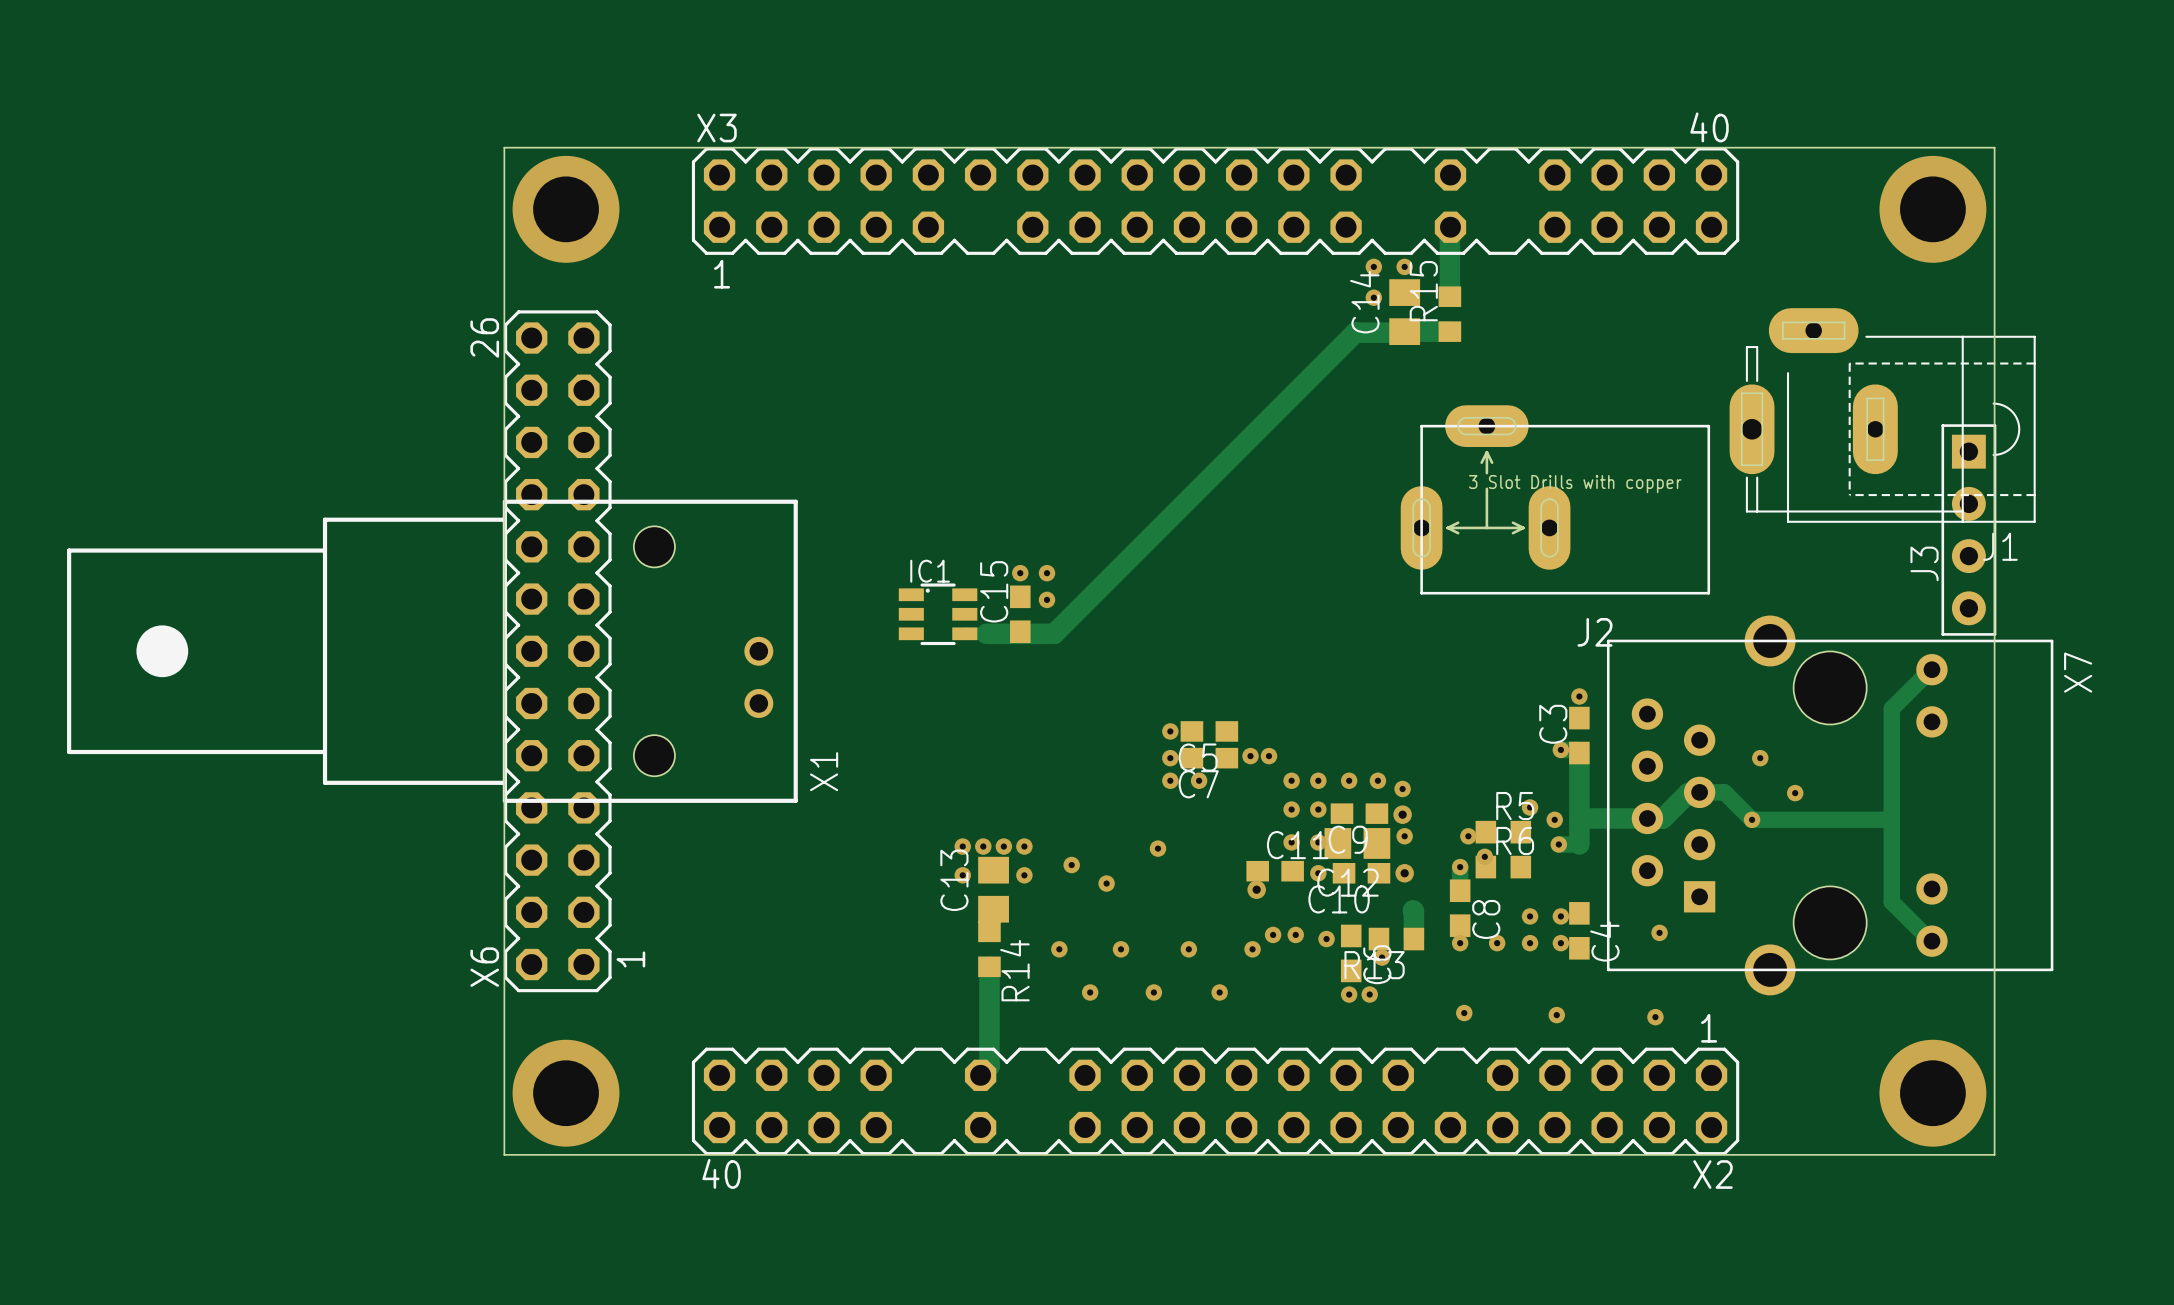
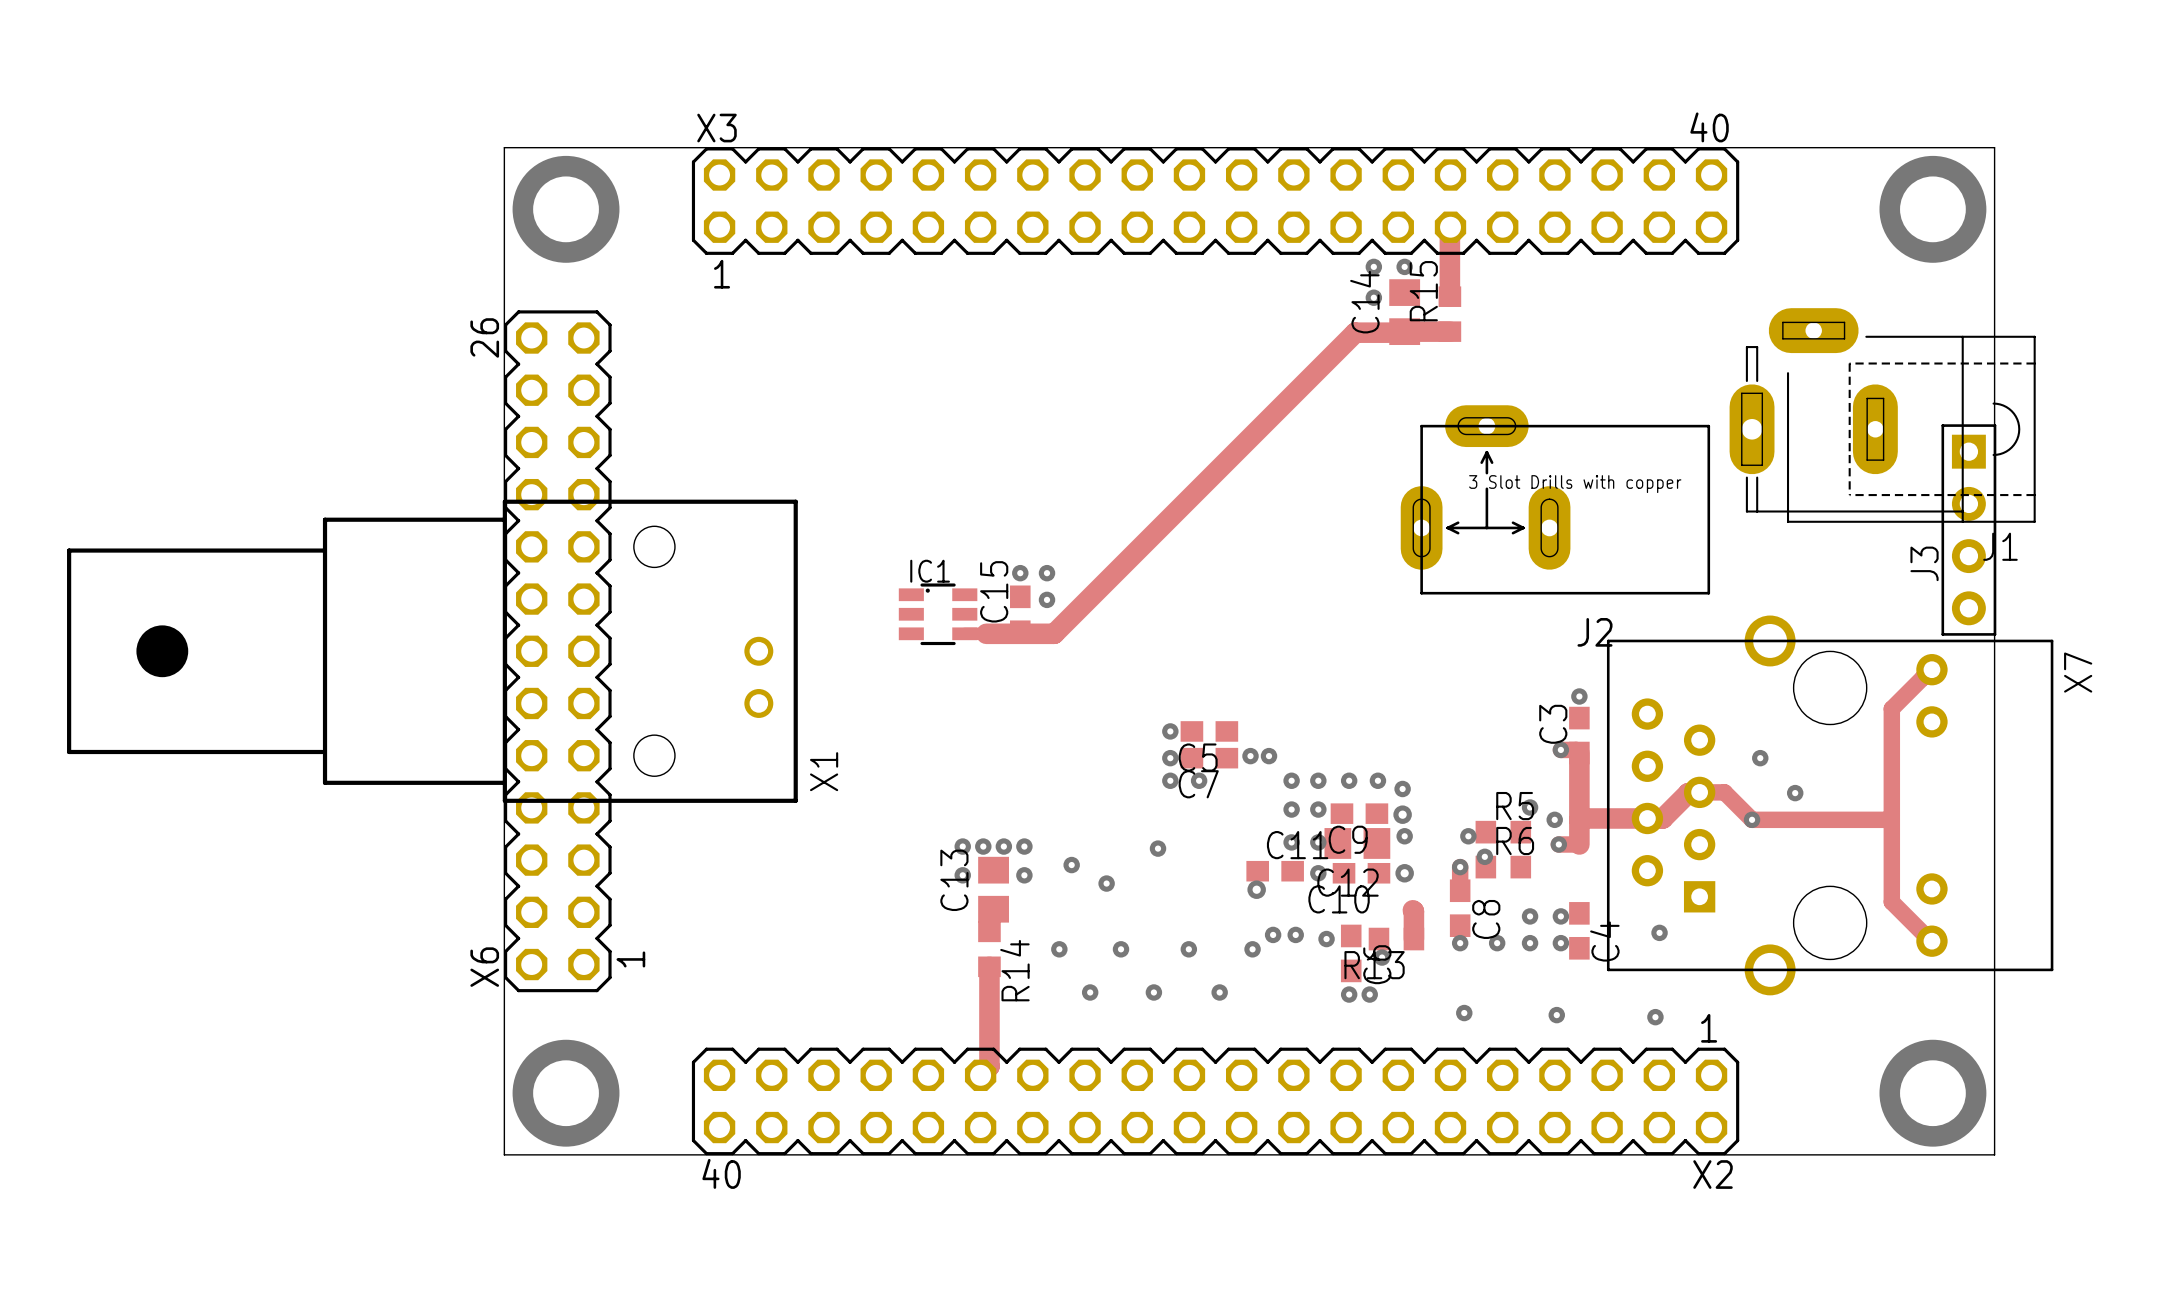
X3 footprint: [691, 147, 1740, 255] -> [691, 147, 1740, 255]
X2 footprint: [691, 1047, 1740, 1156] -> [691, 1047, 1740, 1156]

